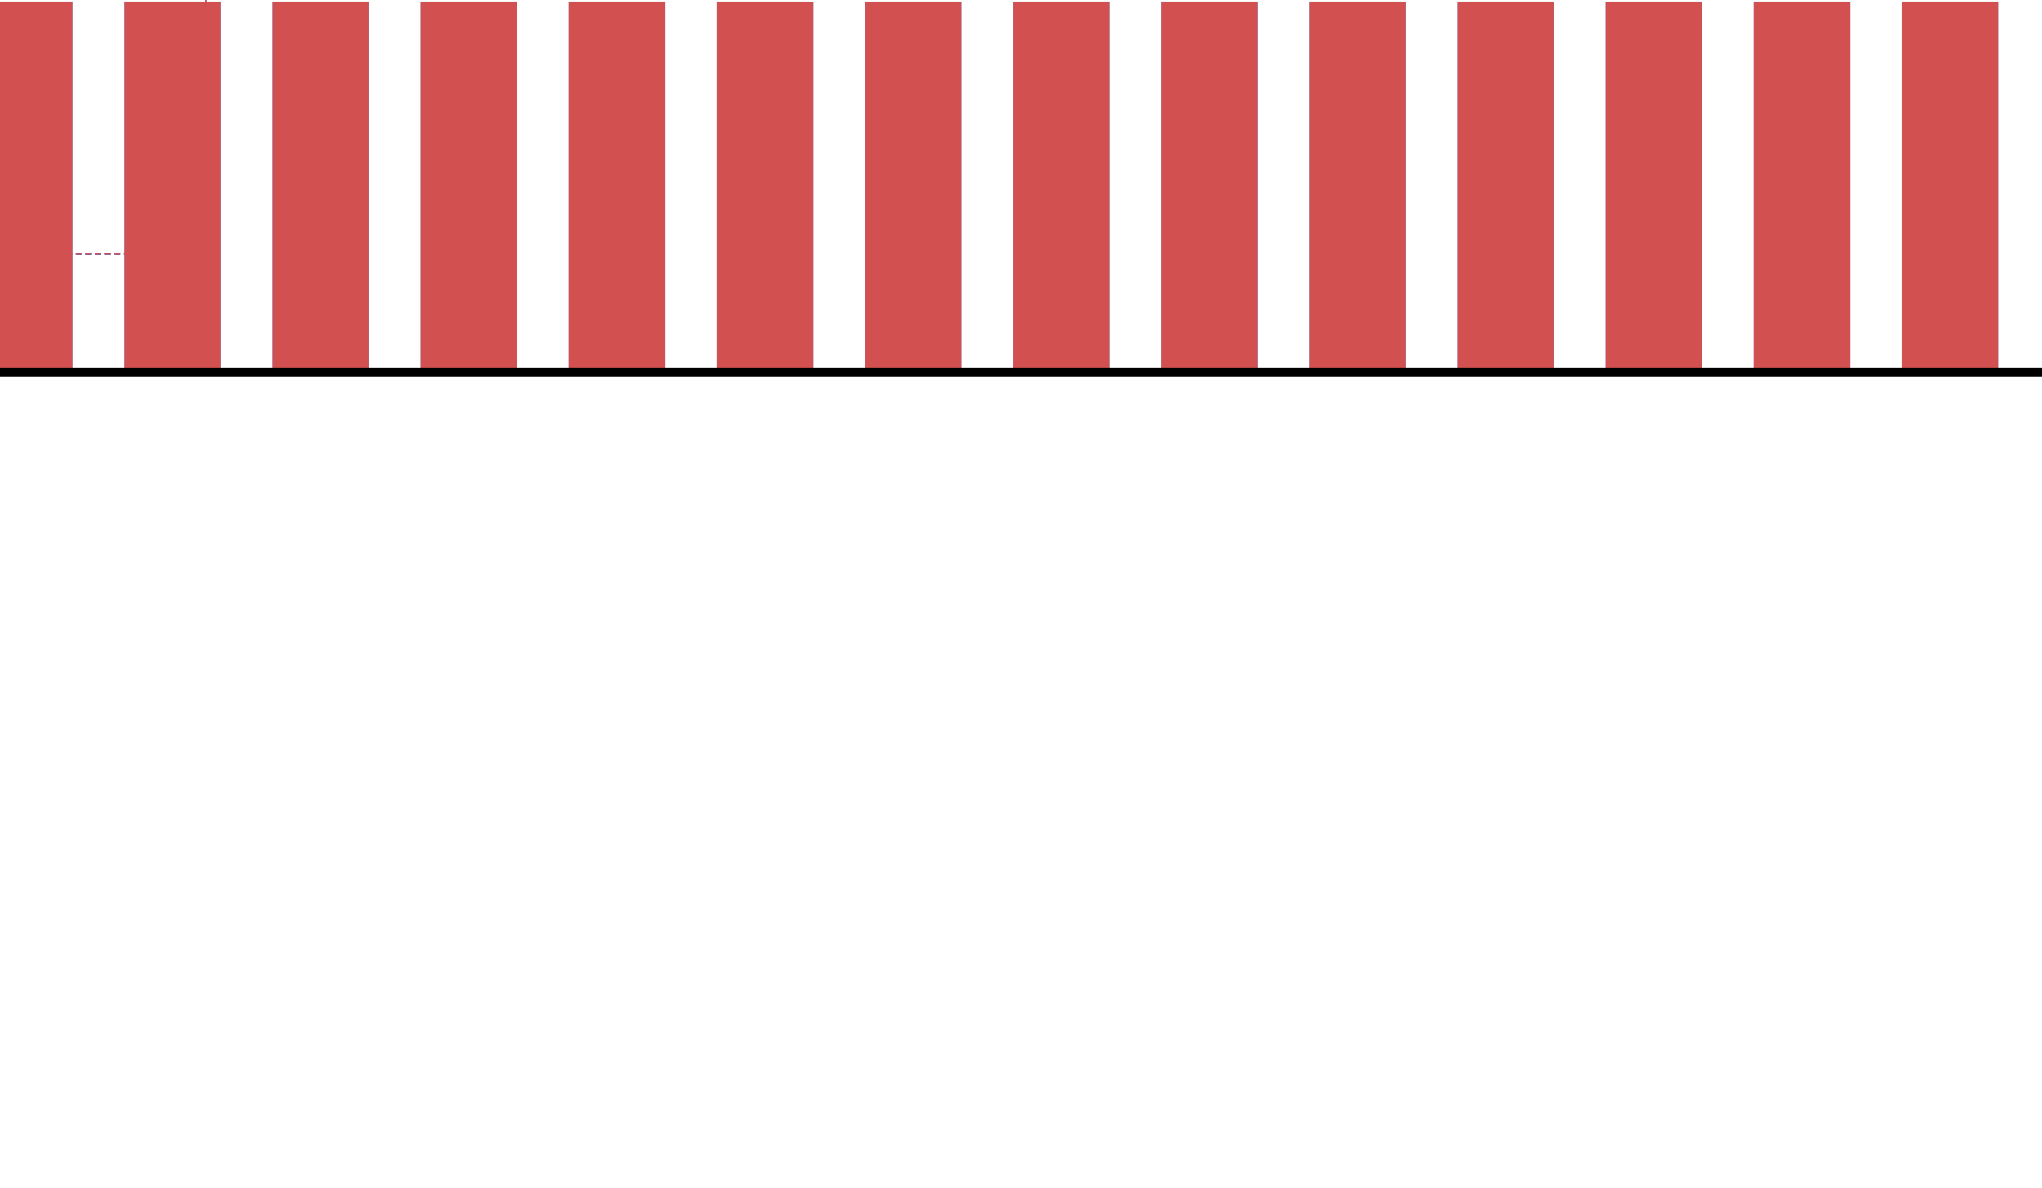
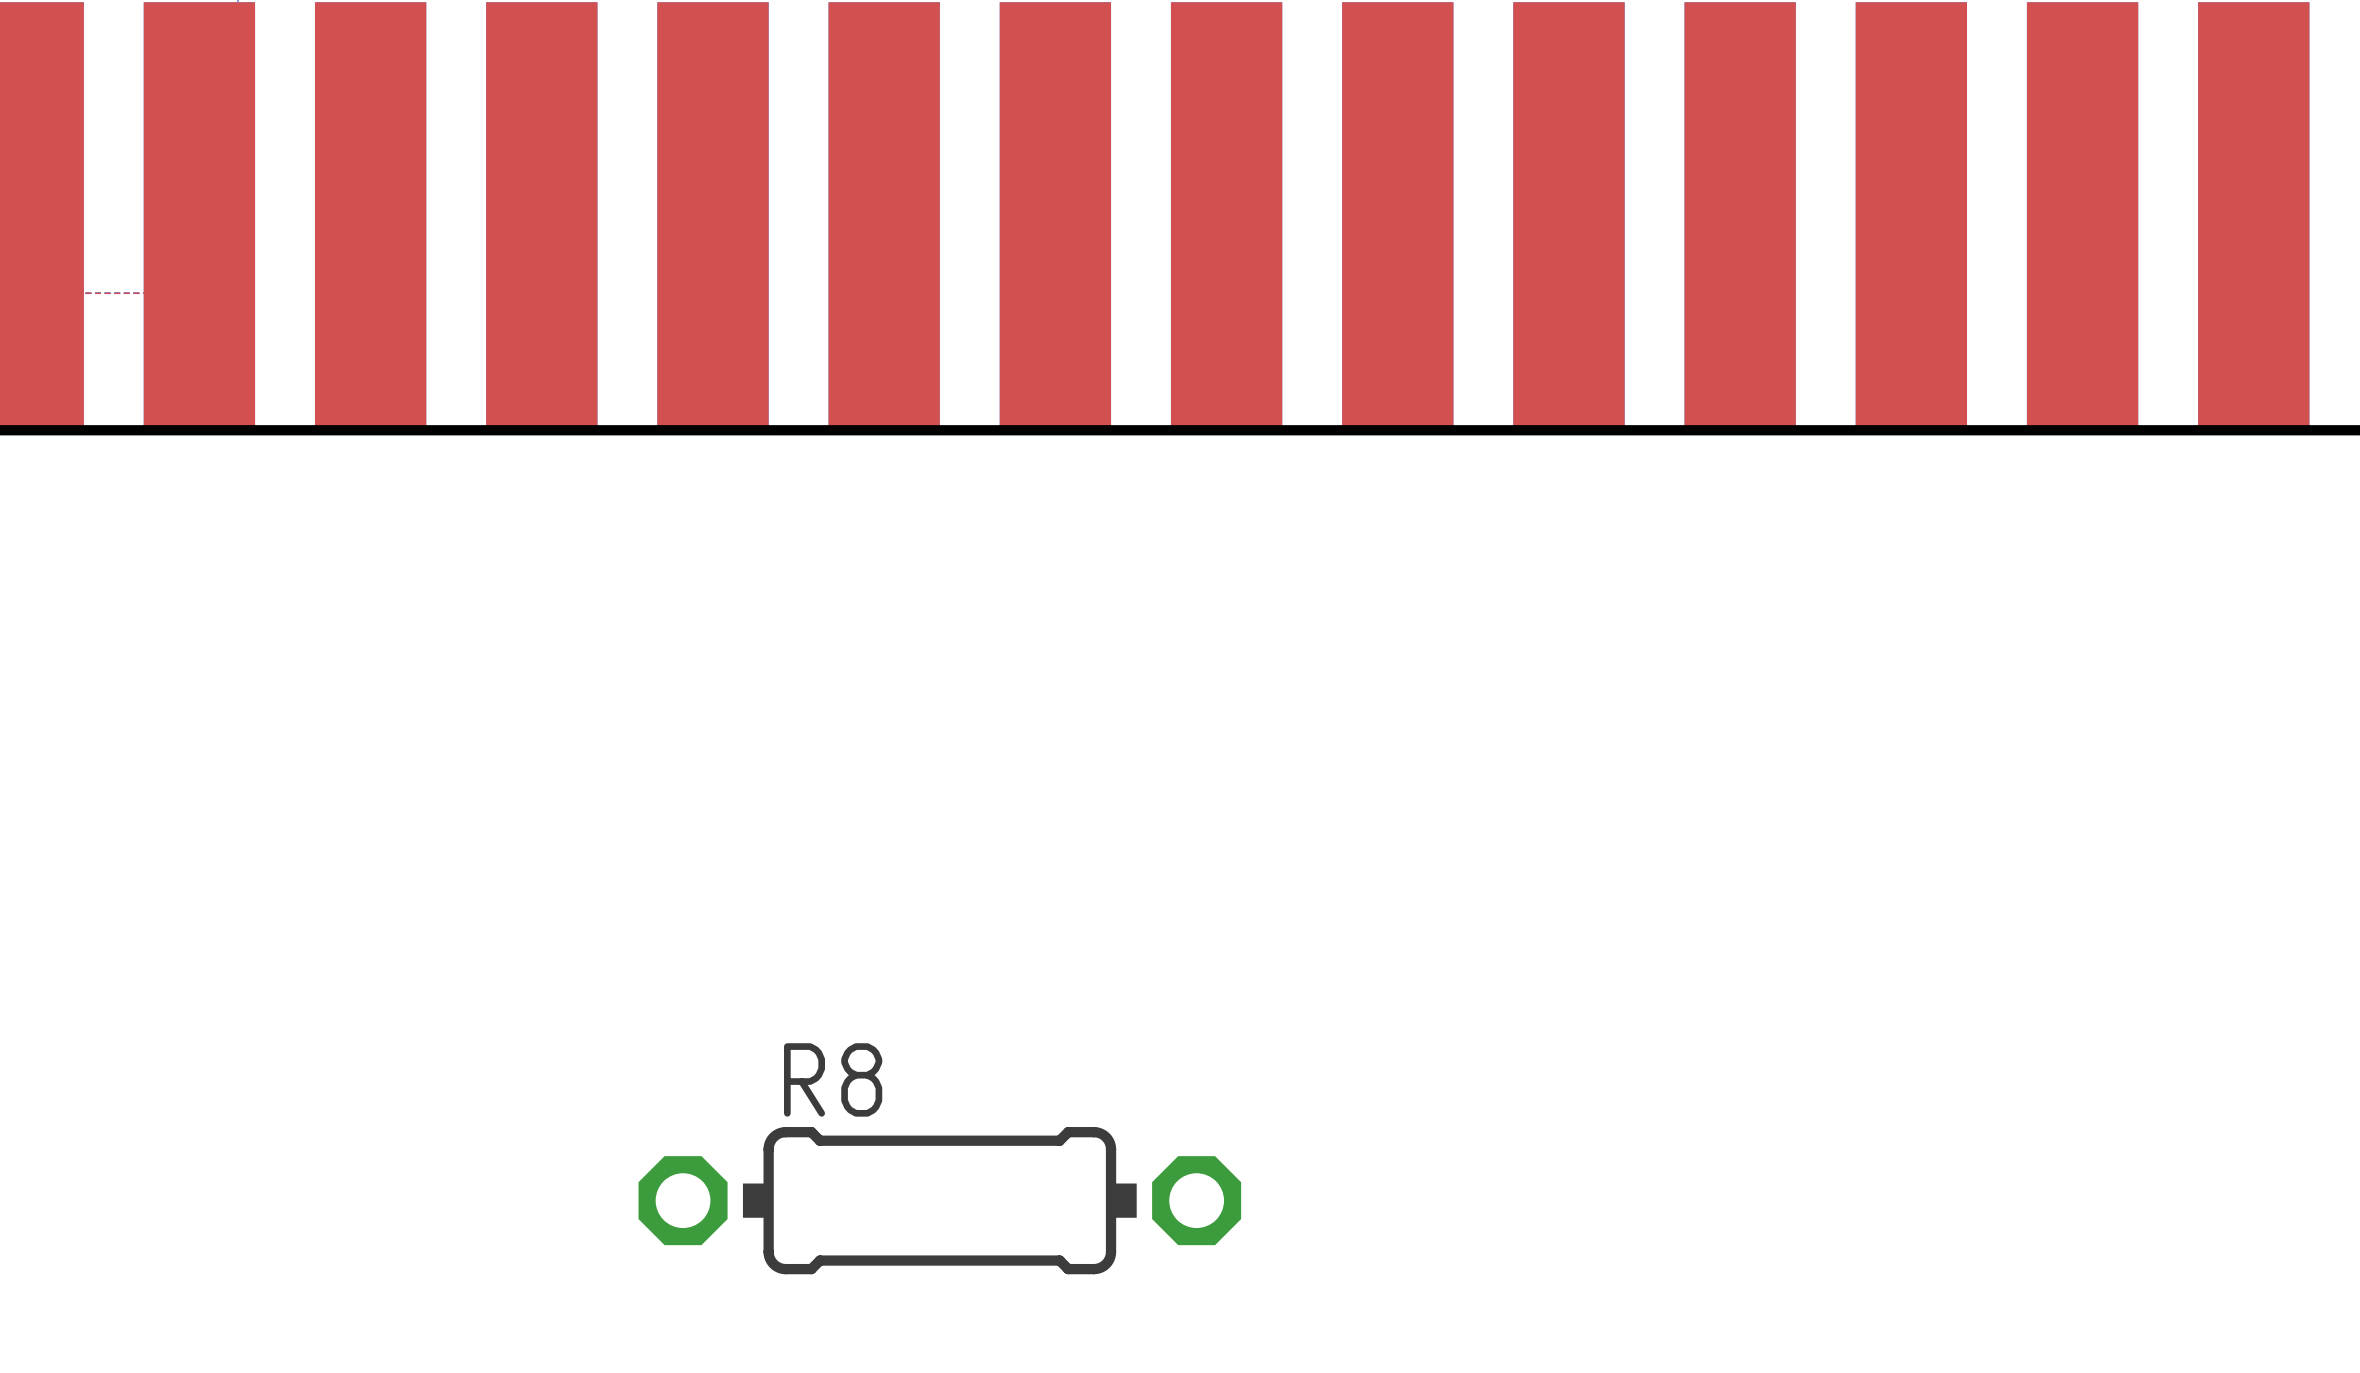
R8: none -> (939, 1200)

